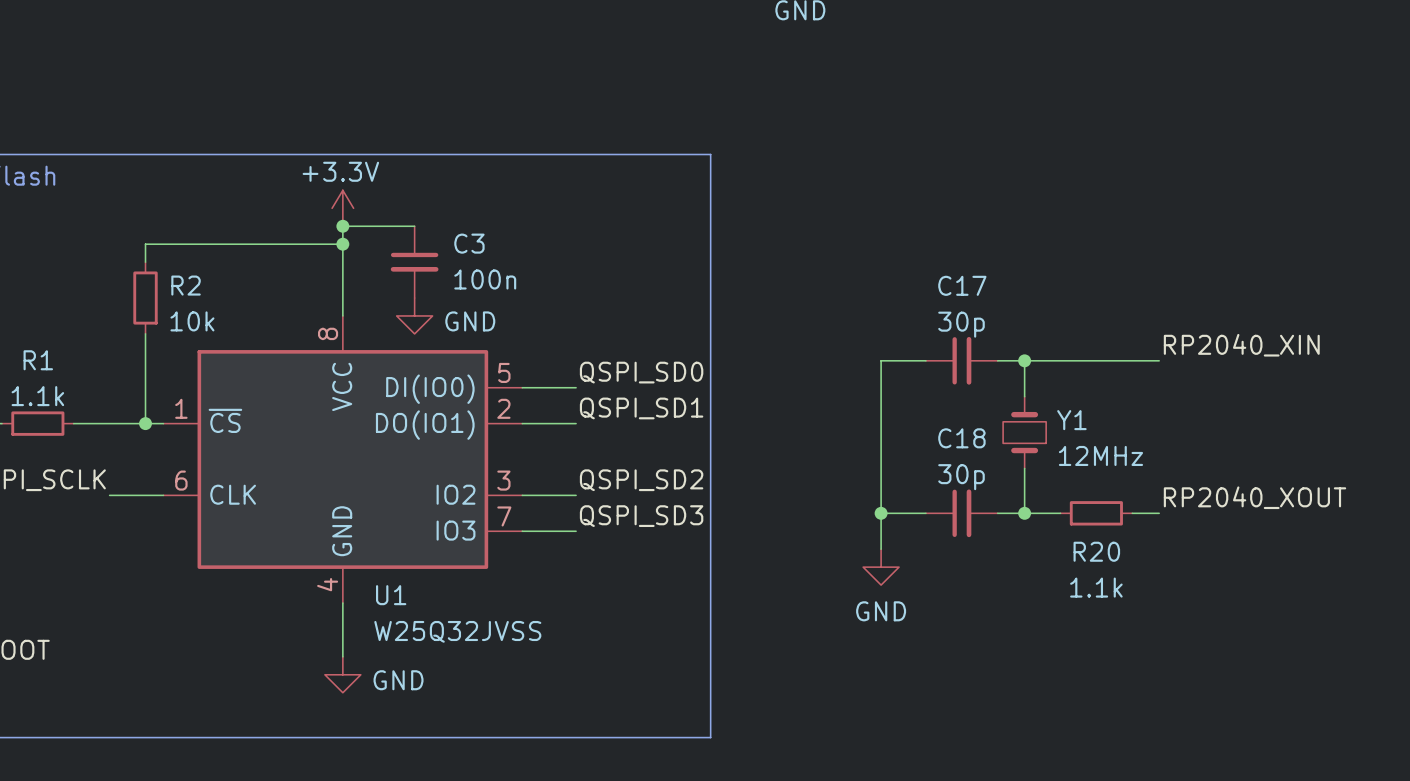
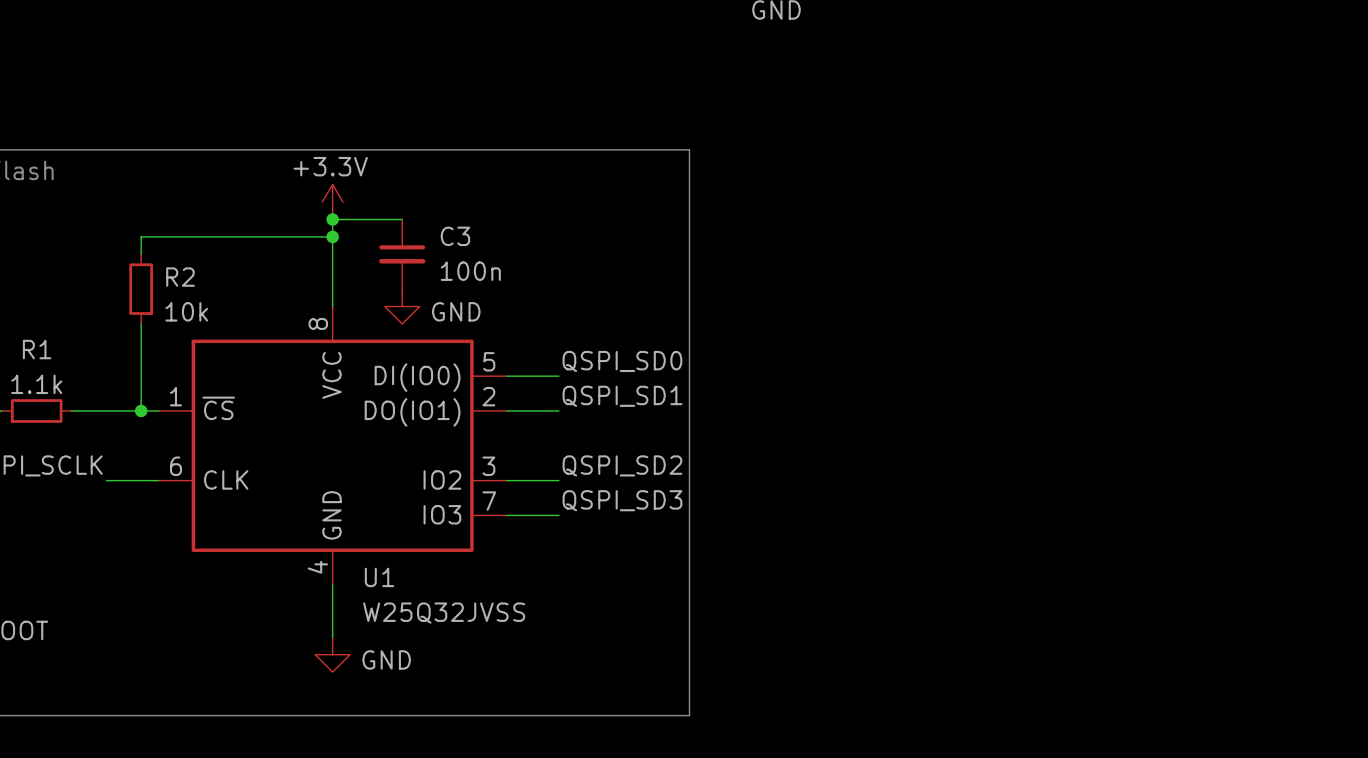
label: RP2040_XIN (1241, 345) -> none
wire: (925, 360) (881, 360) (881, 549) -> none
C17: 30p (961, 360) -> none
wire: (997, 360) (1159, 360) -> none
wire: (1024, 360) (1024, 396) -> none
junction: (1024, 360) -> none
Y1: 12MHz (1024, 432) -> none
wire: (1024, 468) (1024, 513) -> none
label: RP2040_XOUT (1255, 497) -> none
wire: (881, 513) (925, 513) -> none
junction: (881, 513) -> none
C18: 30p (961, 513) -> none
wire: (997, 513) (1060, 513) -> none
junction: (1024, 513) -> none
R20: 1.1k (1096, 513) -> none
wire: (1132, 513) (1159, 513) -> none
power symbol: GND (881, 567) -> none

